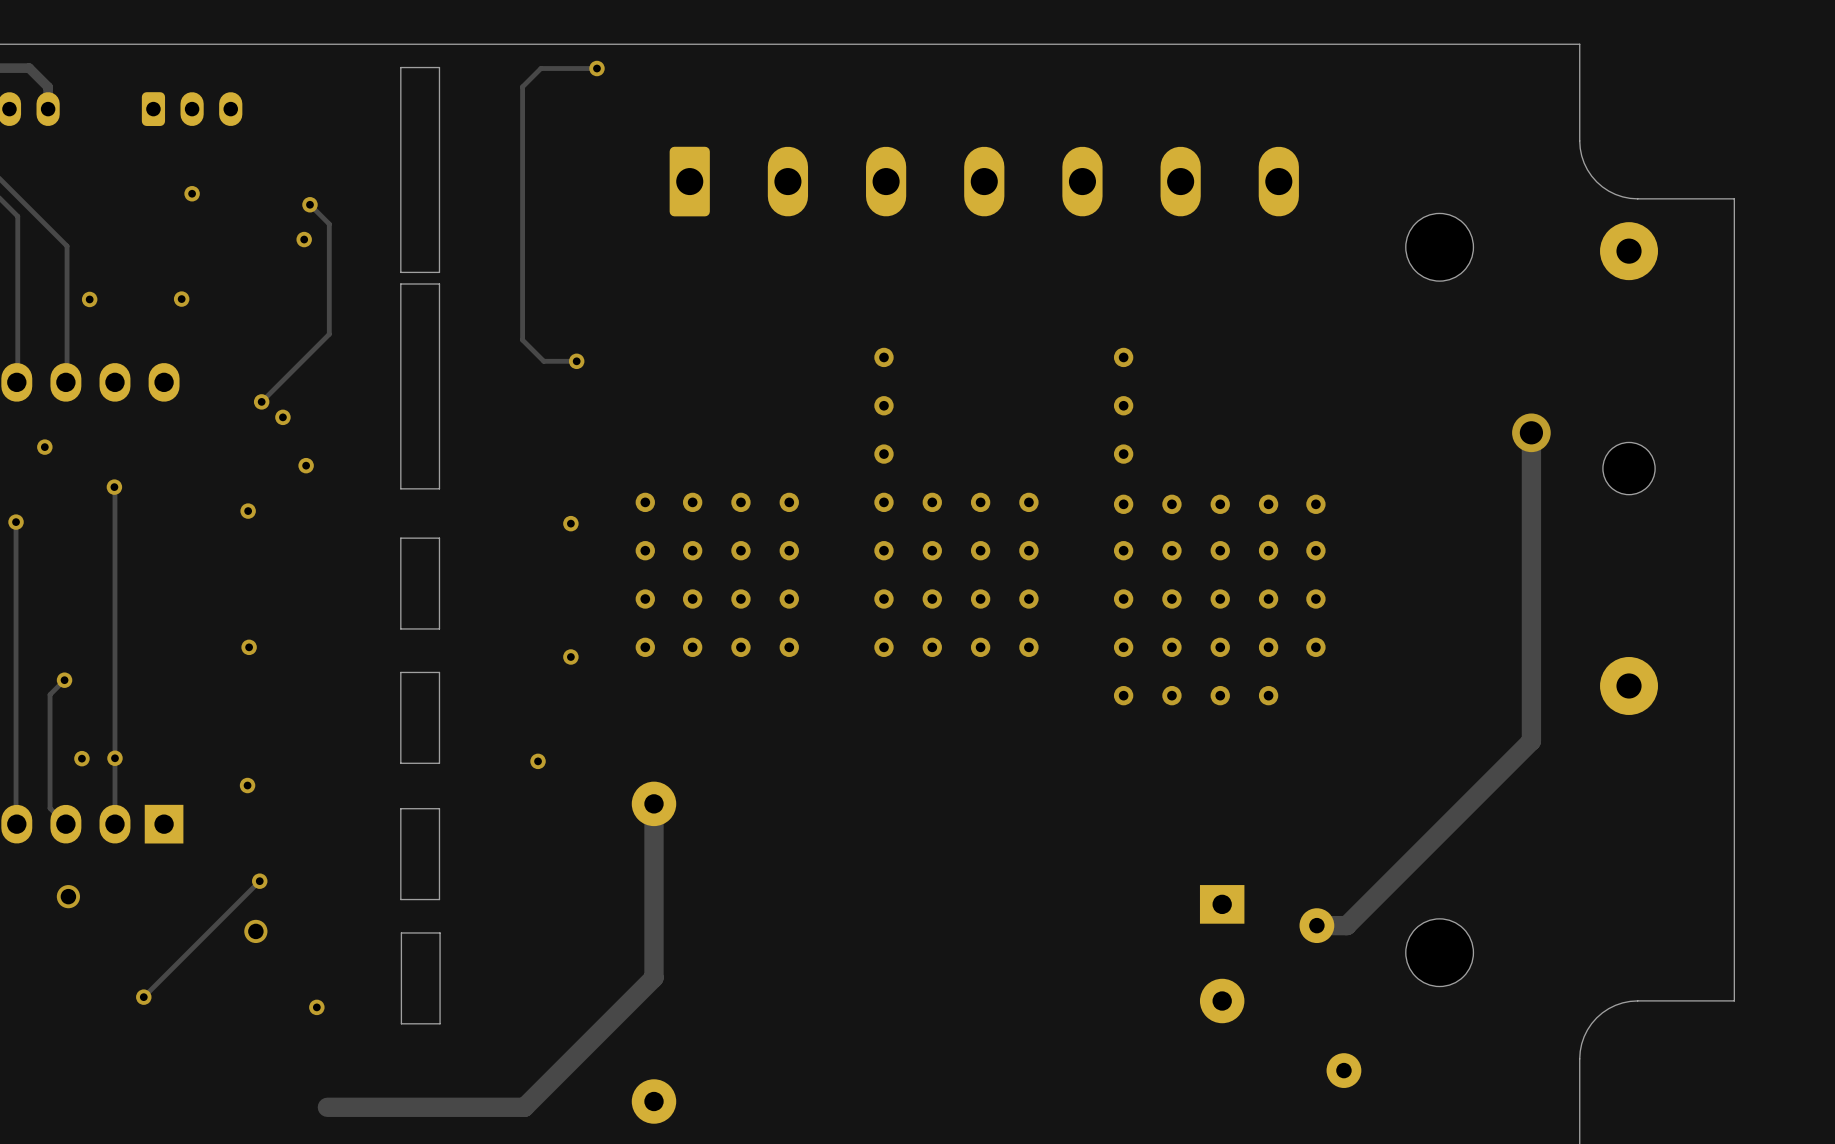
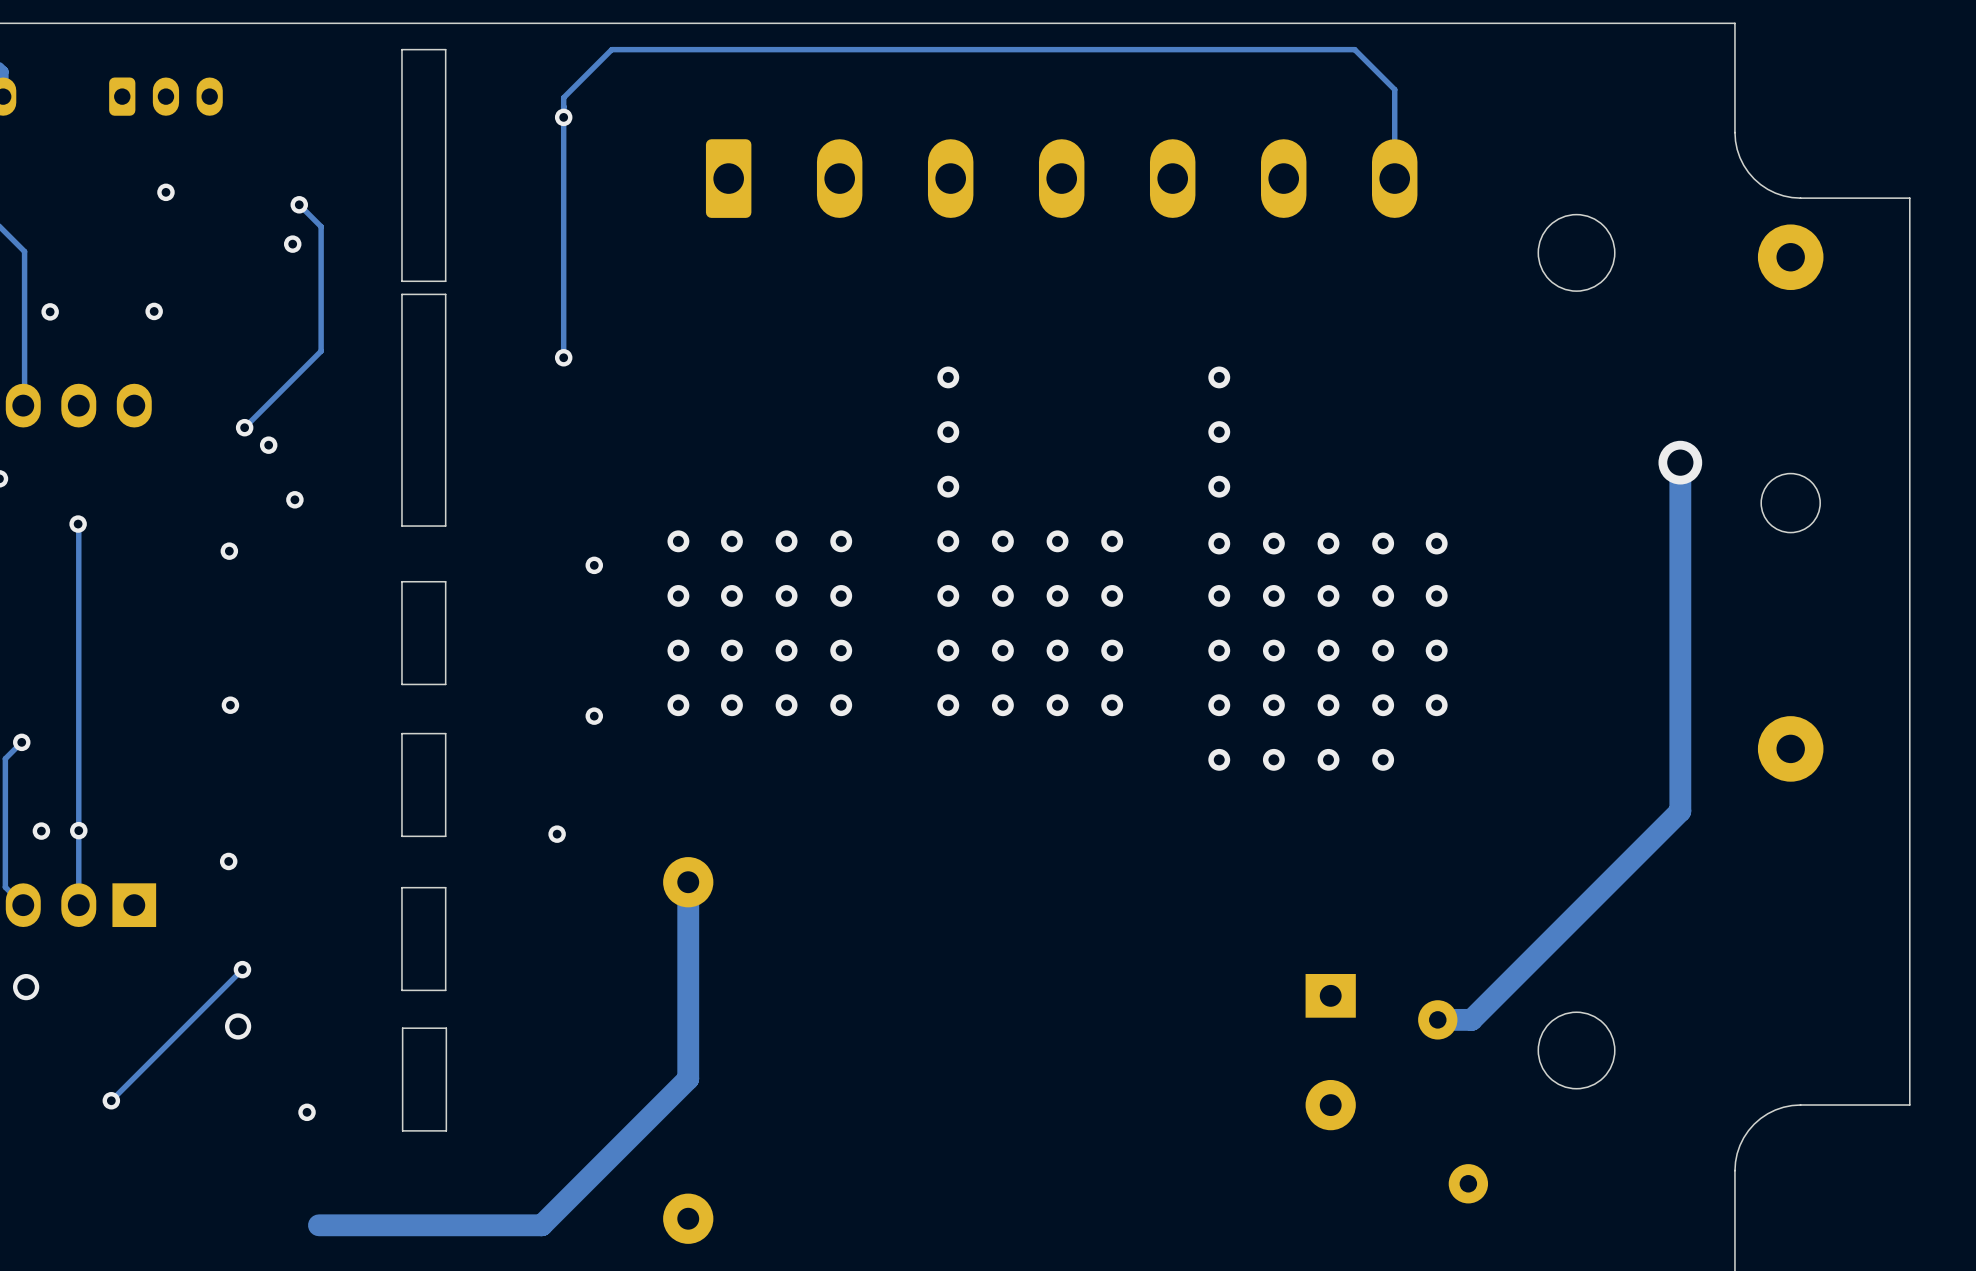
track: (596, 68) (540, 68) (522, 86) (522, 340) (543, 361) (576, 361) -> none
via position: (596, 68) -> (563, 117)
track: none -> (1394, 178) (1394, 89) (1354, 49) (611, 49) (563, 97) (563, 357)
via position: (576, 361) -> (563, 357)

